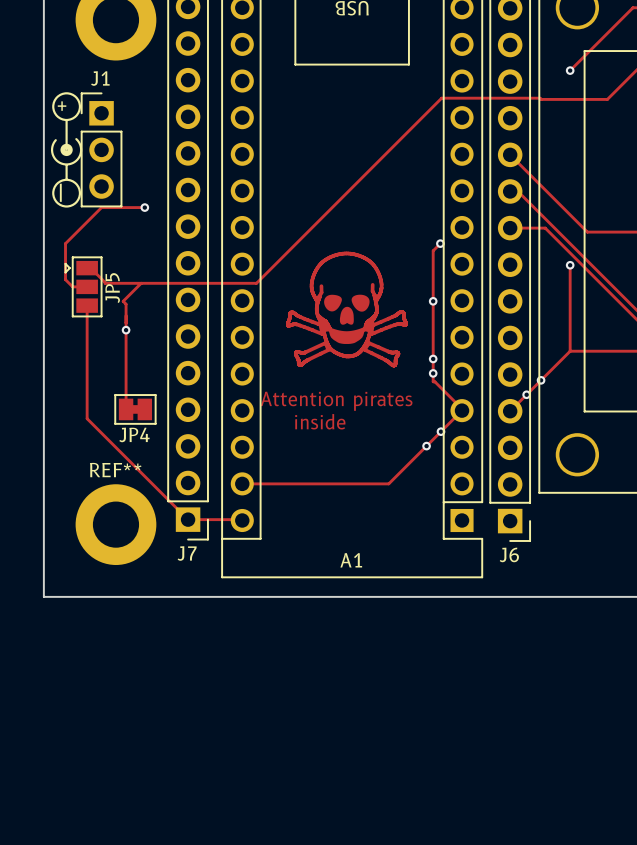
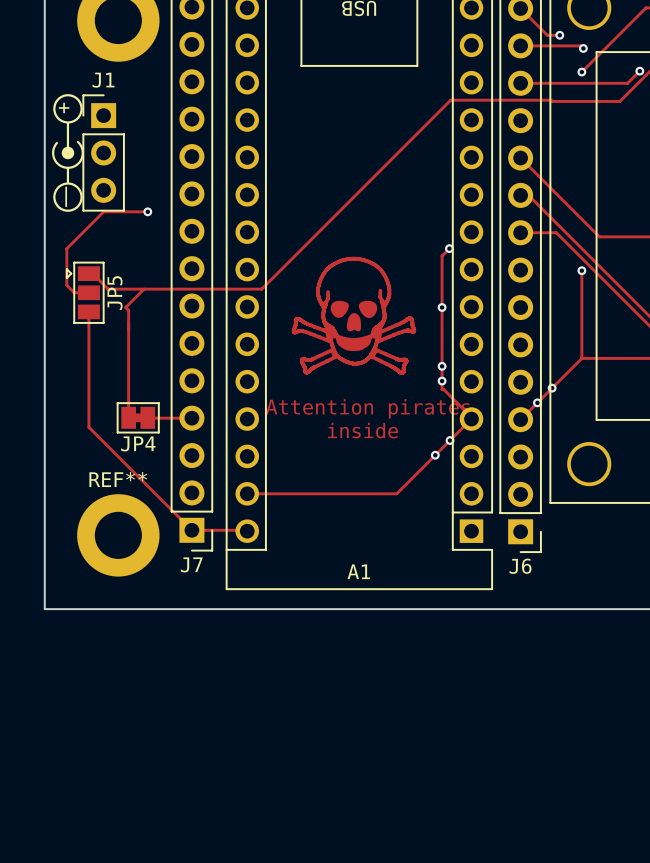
track: none -> (520, 8) (547, 35) (559, 35)
via: none -> (559, 35)
track: none -> (520, 45) (580, 45) (583, 48)
via: none -> (583, 48)
track: none -> (639, 71) (627, 83) (520, 83)
via: none -> (639, 71)
via: (126, 330) -> none
track: none -> (147, 417) (191, 418)

